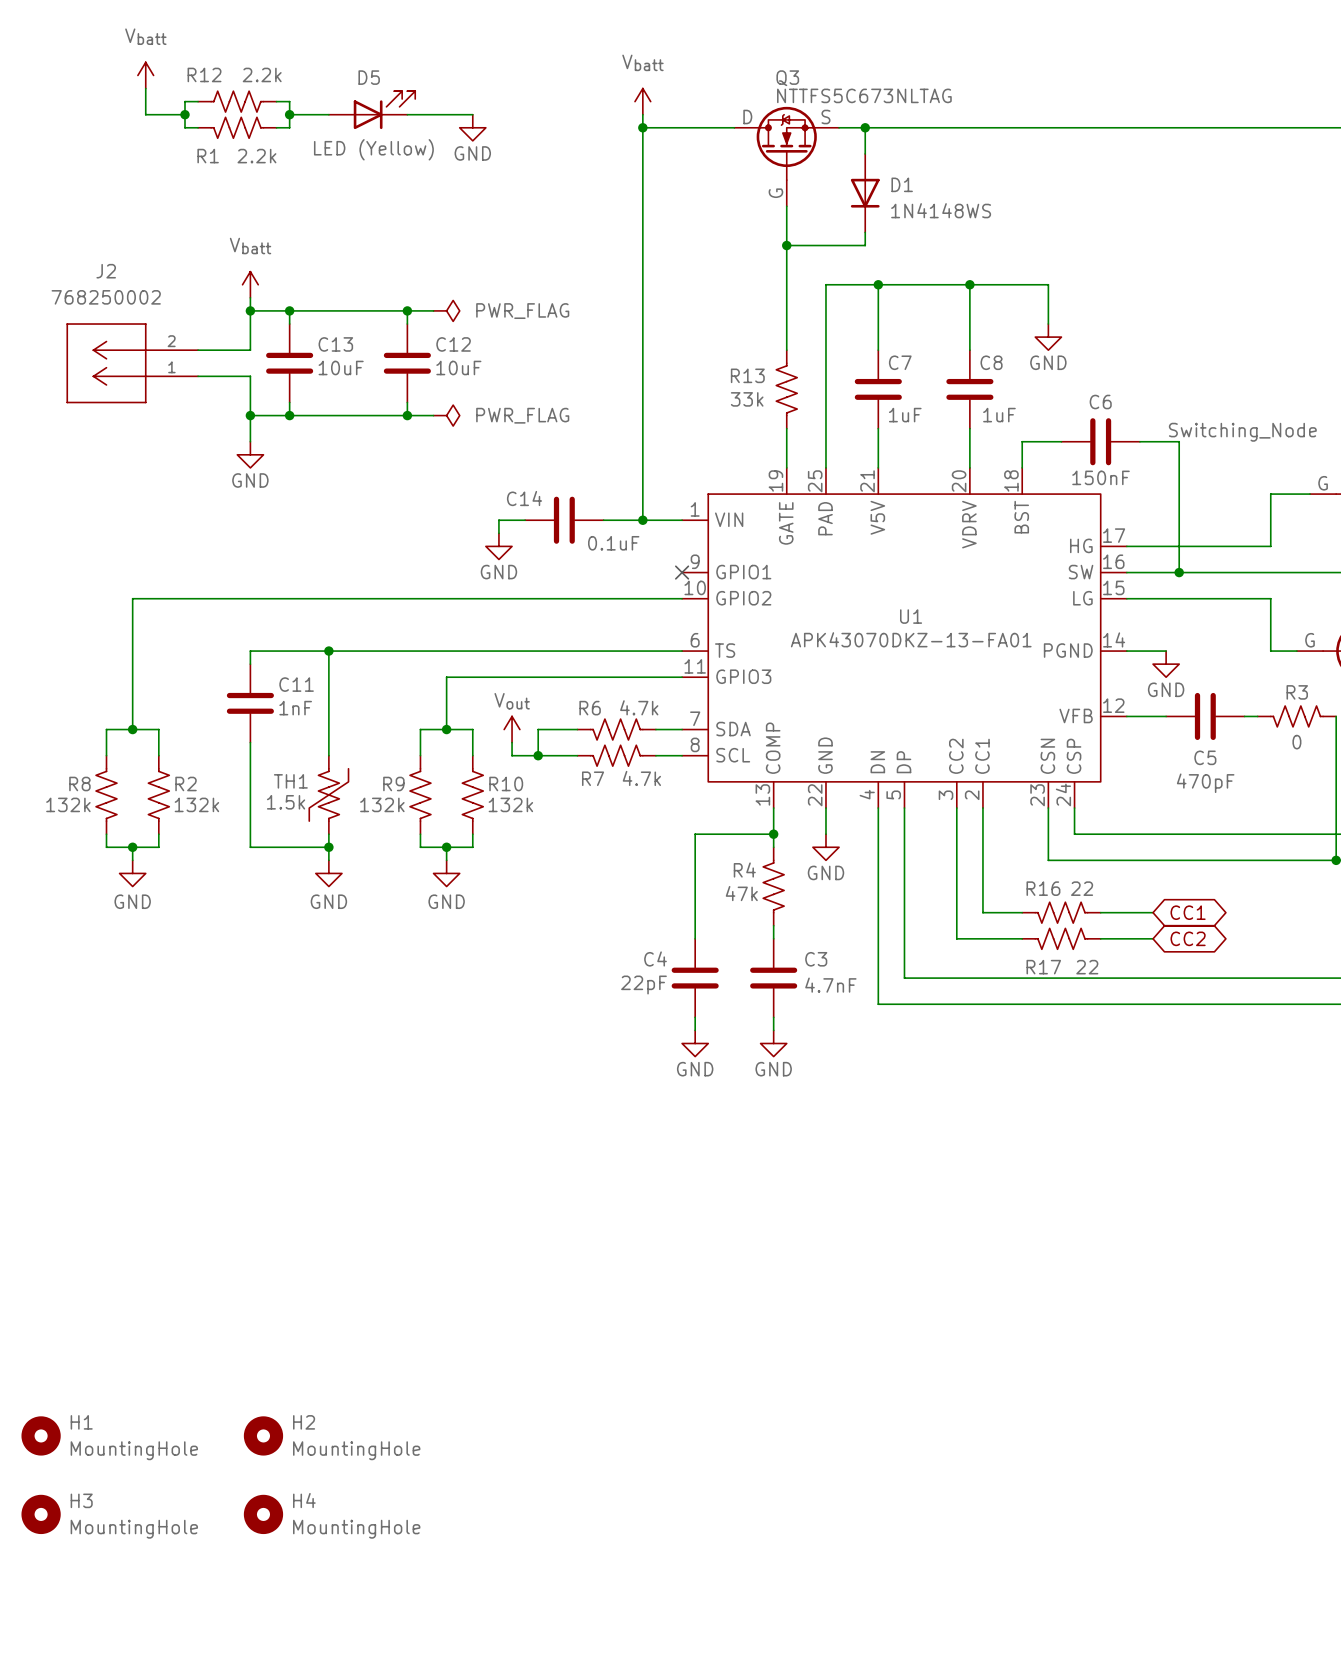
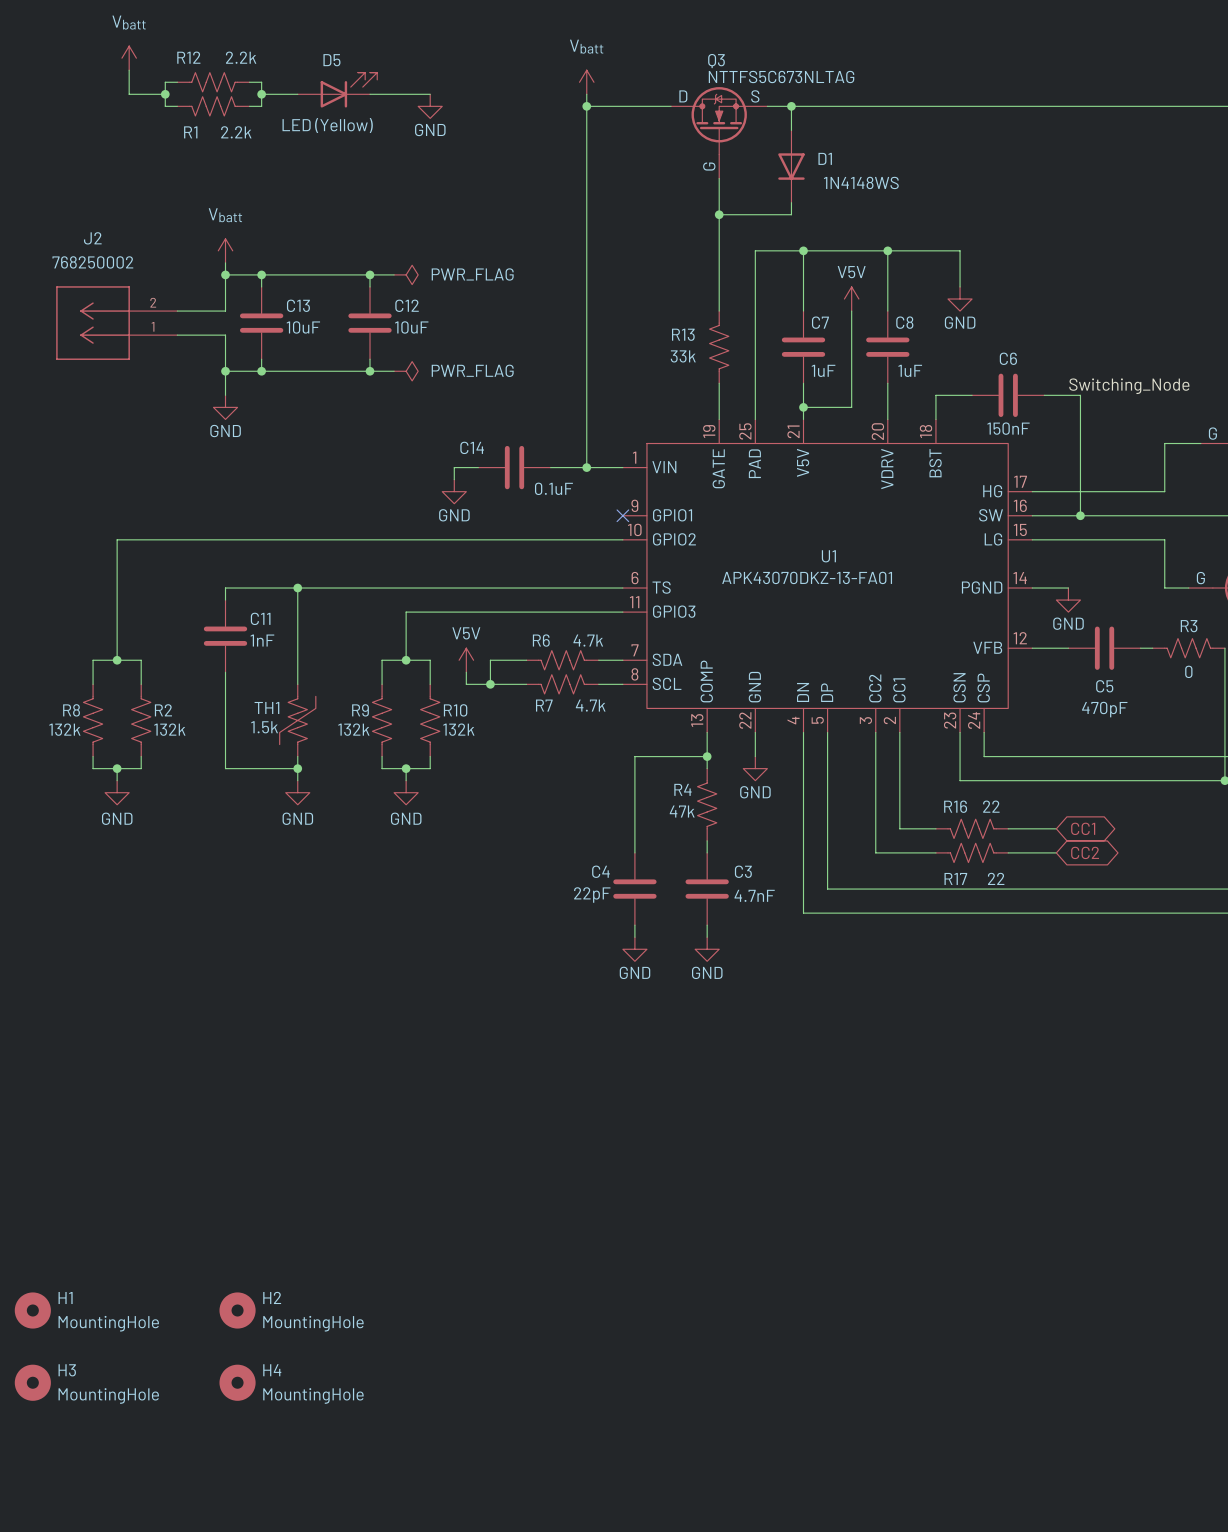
power symbol: none -> V5V (851, 299)
wire: none -> (851, 311) (851, 407) (803, 407)
junction: none -> (803, 407)
power symbol: Vout (512, 729) -> V5V (466, 660)

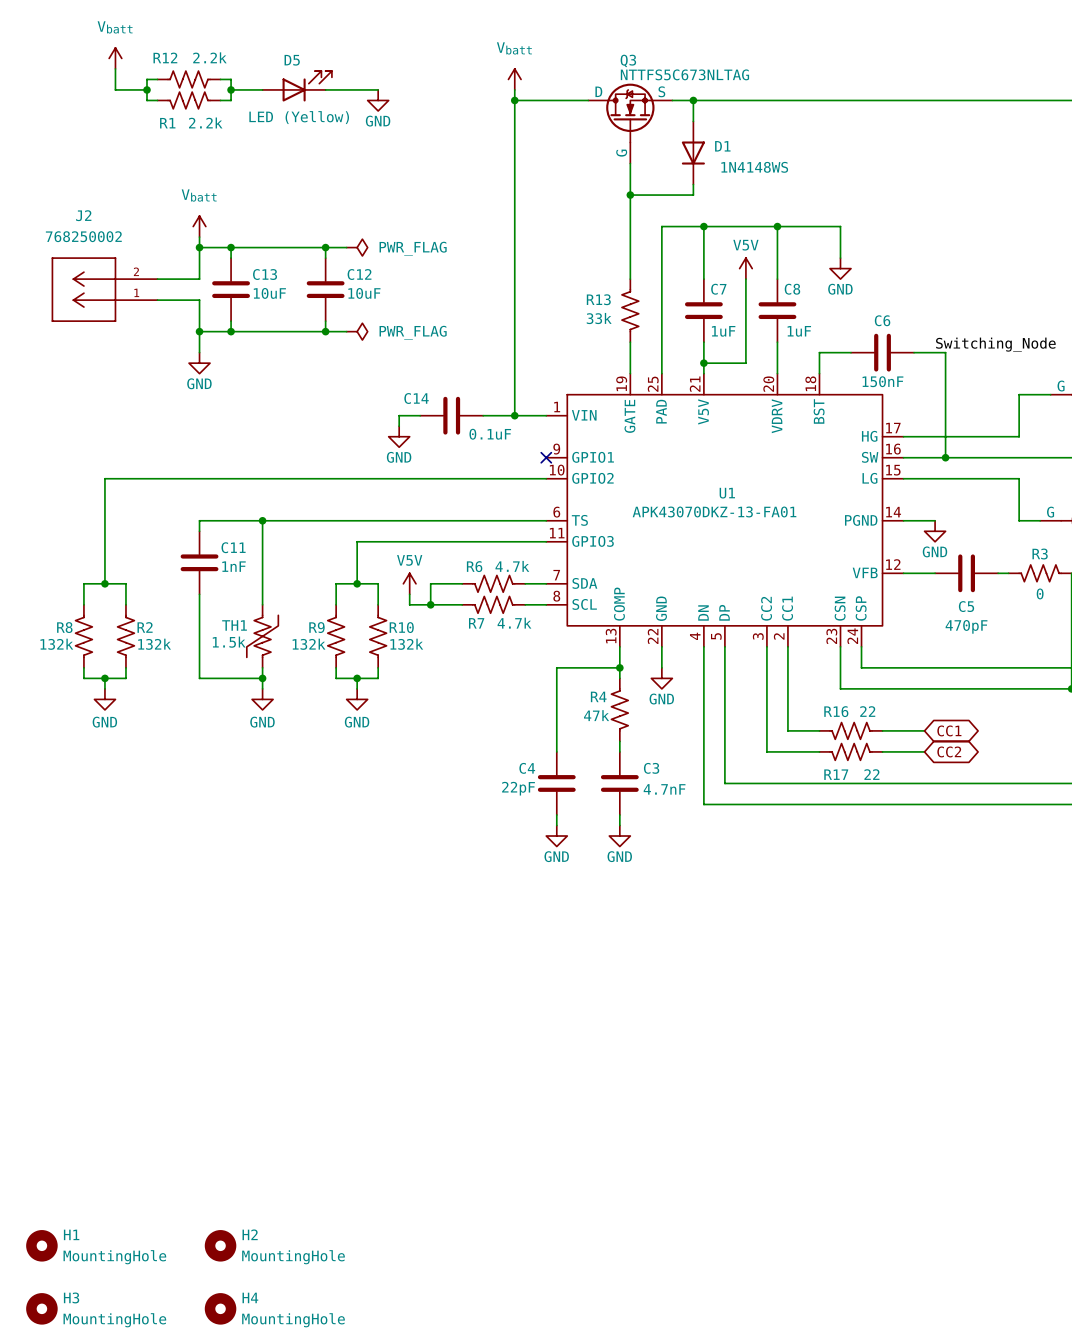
H1 position: (32, 1310) -> (41, 1245)
H2 position: (237, 1310) -> (220, 1245)
H3 position: (32, 1382) -> (41, 1308)
H4 position: (237, 1382) -> (220, 1308)

